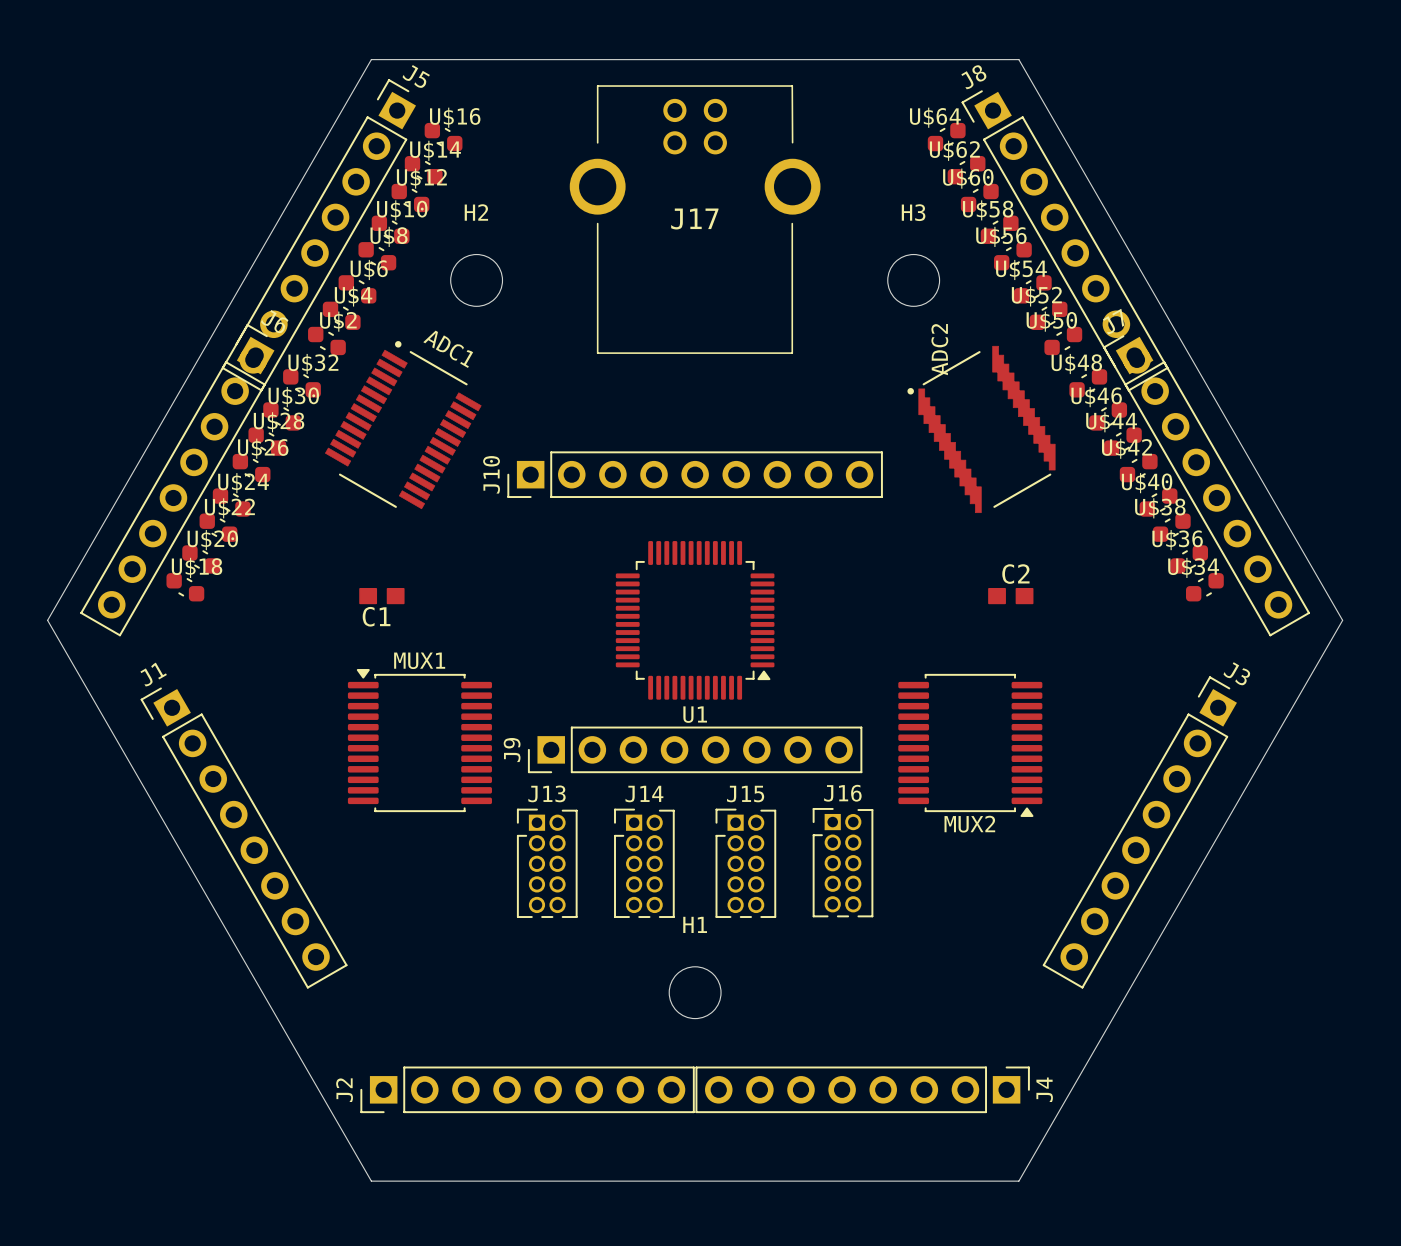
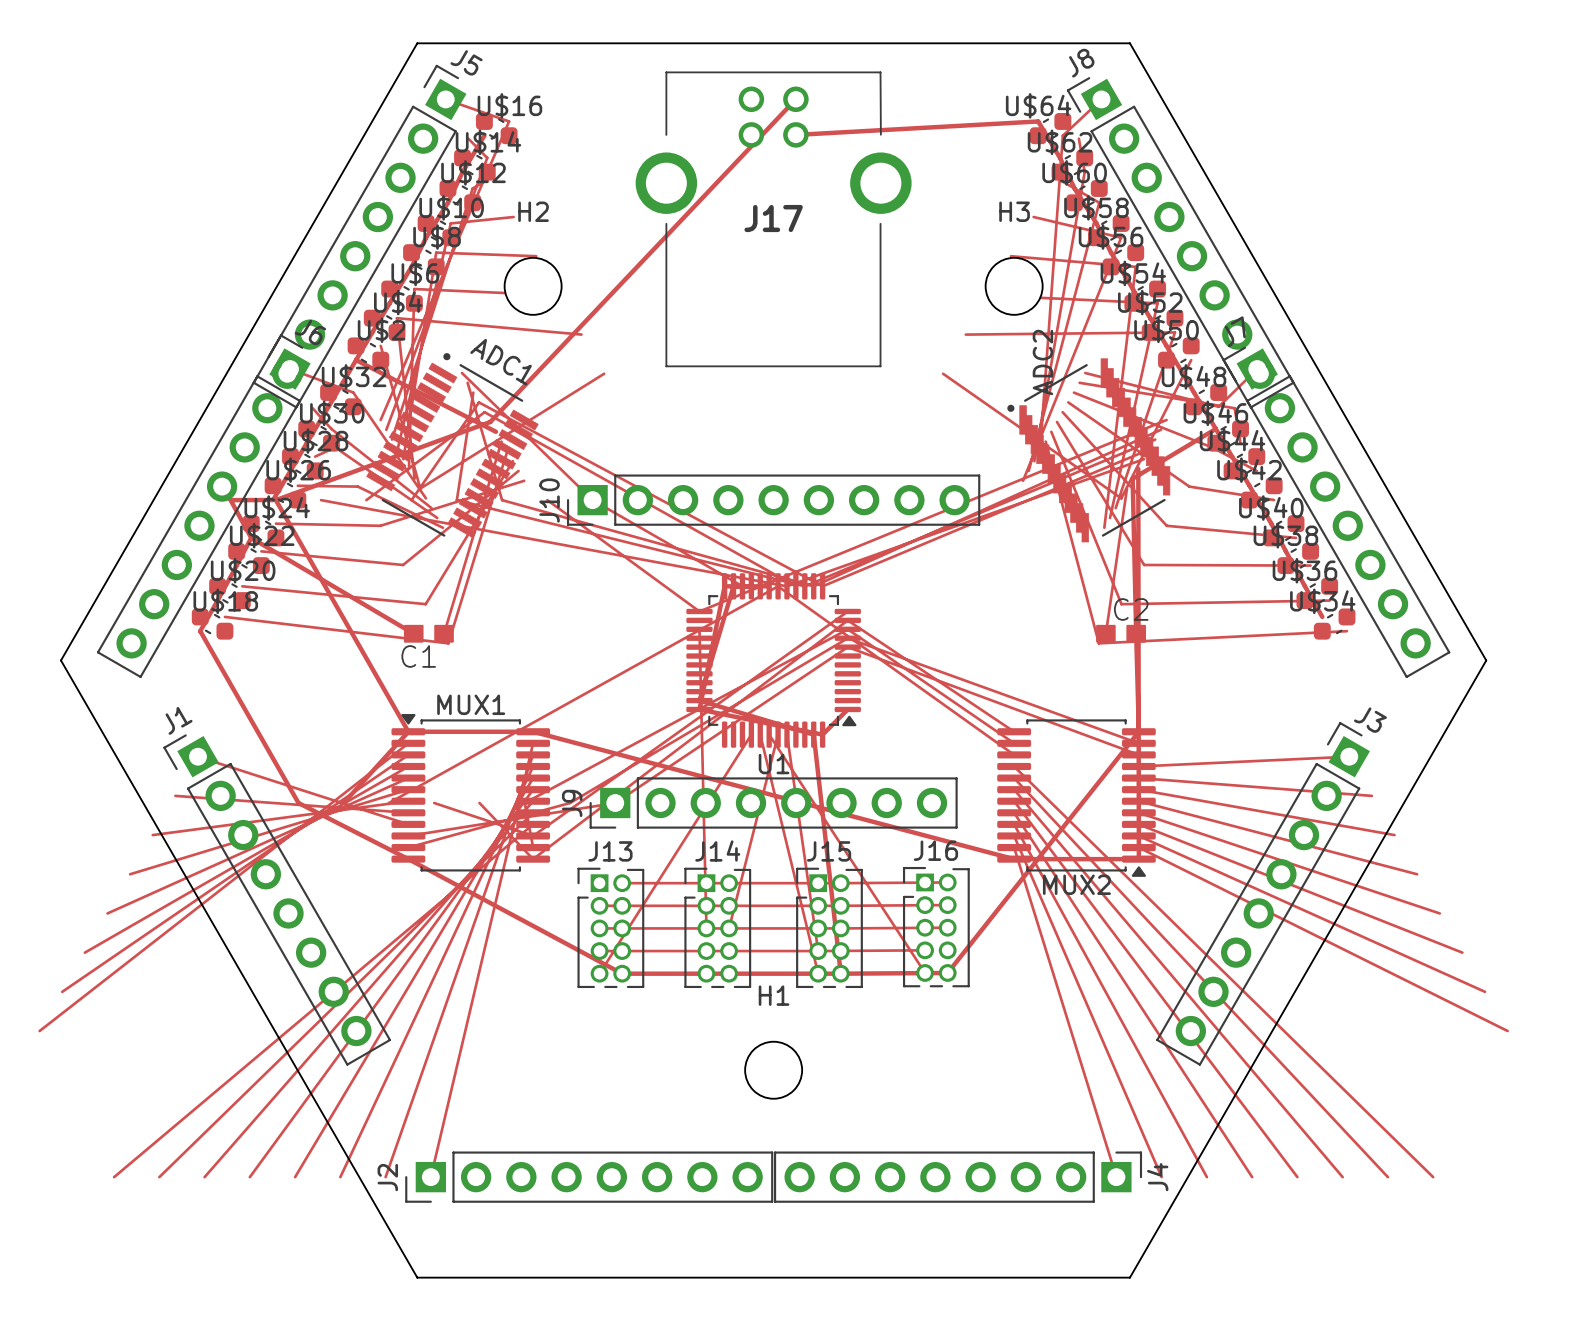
track: none -> (445, 99) (509, 121) (380, 419)
track: none -> (795, 99) (490, 422) (275, 500) (408, 731)
track: none -> (1101, 99) (1062, 135) (1040, 451)
track: none -> (795, 134) (1038, 121) (1111, 252) (1215, 428)
track: none -> (484, 135) (411, 266) (356, 360)
track: none -> (468, 138) (487, 157) (386, 429)
track: none -> (1078, 138) (1084, 172) (1034, 461)
track: none -> (491, 177) (472, 188) (391, 439)
track: none -> (1056, 177) (1099, 202) (1028, 470)
track: none -> (513, 217) (450, 223) (397, 449)
track: none -> (1033, 217) (1121, 237) (1023, 480)
track: none -> (536, 256) (436, 252) (403, 459)
track: none -> (1011, 256) (1135, 266) (1104, 527)
track: none -> (558, 295) (414, 289) (408, 468)
track: none -> (988, 295) (1157, 303) (1110, 517)
track: none -> (581, 334) (397, 318) (414, 478)
track: none -> (965, 334) (1174, 332) (1115, 508)
track: none -> (380, 345) (420, 488) (604, 373)
track: none -> (356, 360) (273, 500) (230, 500) (251, 537)
track: none -> (356, 360) (495, 431)
track: none -> (1191, 360) (1121, 498) (943, 373)
track: none -> (289, 369) (353, 392) (425, 498)
track: none -> (1257, 369) (1218, 406) (1085, 373)
track: none -> (461, 373) (592, 500) (742, 586)
track: none -> (467, 382) (502, 500) (813, 586) (1160, 429)
track: none -> (1079, 382) (1234, 408) (1240, 443)
track: none -> (473, 392) (456, 500) (804, 586) (1155, 439)
track: none -> (1073, 392) (1212, 447) (1256, 470)
track: none -> (1068, 402) (1189, 486) (1274, 500)
track: none -> (312, 408) (331, 428) (431, 508)
track: none -> (1062, 412) (1166, 525) (1296, 537)
track: none -> (1166, 419) (699, 611) (547, 500)
track: none -> (1056, 422) (1144, 564) (1310, 565)
track: none -> (1215, 428) (1132, 478) (1138, 731) (947, 972) (840, 973)
track: none -> (1215, 428) (1271, 523) (1322, 616)
track: none -> (1051, 431) (1121, 604) (1329, 600)
track: none -> (501, 441) (444, 633)
track: none -> (1045, 441) (1098, 643) (1347, 631)
track: none -> (1149, 449) (822, 586) (478, 402) (411, 500)
track: none -> (507, 451) (448, 643) (224, 616)
track: none -> (315, 456) (335, 447) (437, 517)
track: none -> (1143, 459) (786, 586) (321, 500)
track: none -> (512, 461) (425, 604) (242, 586)
track: none -> (1138, 468) (1138, 859) (1014, 859) (533, 731) (408, 731)
track: none -> (518, 470) (403, 564) (261, 551)
track: none -> (524, 480) (380, 525) (275, 523)
track: none -> (297, 485) (357, 486) (442, 527)
track: none -> (1126, 488) (1105, 633)
track: none -> (366, 500) (484, 412) (795, 586)
track: none -> (251, 537) (200, 631) (298, 803) (408, 859) (622, 973) (840, 973)
track: none -> (251, 537) (413, 633)
track: none -> (733, 586) (699, 700) (813, 734) (840, 973)
track: none -> (769, 586) (724, 586) (699, 709) (822, 734) (847, 709)
track: none -> (847, 611) (533, 835) (434, 803)
track: none -> (699, 629) (706, 928)
track: none -> (408, 731) (343, 803)
track: none -> (1014, 731) (847, 620) (533, 859) (479, 803)
track: none -> (751, 734) (599, 973)
track: none -> (760, 734) (818, 973)
track: none -> (769, 734) (925, 972)
track: none -> (778, 734) (729, 928)
track: none -> (786, 734) (818, 951)
track: none -> (408, 743) (39, 1031)
track: none -> (533, 743) (430, 1177)
track: none -> (1014, 743) (847, 629) (524, 803) (533, 847)
track: none -> (1138, 743) (847, 638) (569, 803) (408, 847)
track: none -> (408, 754) (62, 991)
track: none -> (533, 754) (385, 1177)
track: none -> (1014, 754) (778, 586) (388, 803)
track: none -> (1138, 754) (847, 647) (615, 803) (408, 835)
track: none -> (198, 756) (408, 824)
track: none -> (1349, 756) (1138, 766)
track: none -> (408, 766) (84, 952)
track: none -> (533, 766) (340, 1177)
track: none -> (1014, 766) (1433, 1177)
track: none -> (408, 778) (107, 913)
track: none -> (533, 778) (295, 1177)
track: none -> (1014, 778) (1387, 1177)
track: none -> (1138, 778) (1371, 795)
track: none -> (408, 789) (130, 874)
track: none -> (533, 789) (249, 1177)
track: none -> (1014, 789) (1342, 1177)
track: none -> (1138, 789) (1394, 835)
track: none -> (175, 795) (408, 812)
track: none -> (408, 801) (152, 835)
track: none -> (533, 801) (204, 1177)
track: none -> (1014, 801) (1297, 1177)
track: none -> (1138, 801) (1417, 874)
track: none -> (533, 812) (159, 1177)
track: none -> (1014, 812) (1252, 1177)
track: none -> (1138, 812) (1439, 913)
track: none -> (533, 824) (114, 1177)
track: none -> (1014, 824) (1206, 1177)
track: none -> (1138, 824) (1462, 952)
track: none -> (1014, 835) (1161, 1177)
track: none -> (1138, 835) (1485, 991)
track: none -> (1014, 847) (1116, 1177)
track: none -> (1138, 847) (1507, 1031)
track: none -> (947, 882) (622, 883)
track: none -> (947, 905) (599, 905)
track: none -> (947, 927) (599, 928)
track: none -> (925, 950) (818, 951)
track: none -> (599, 951) (818, 951)

